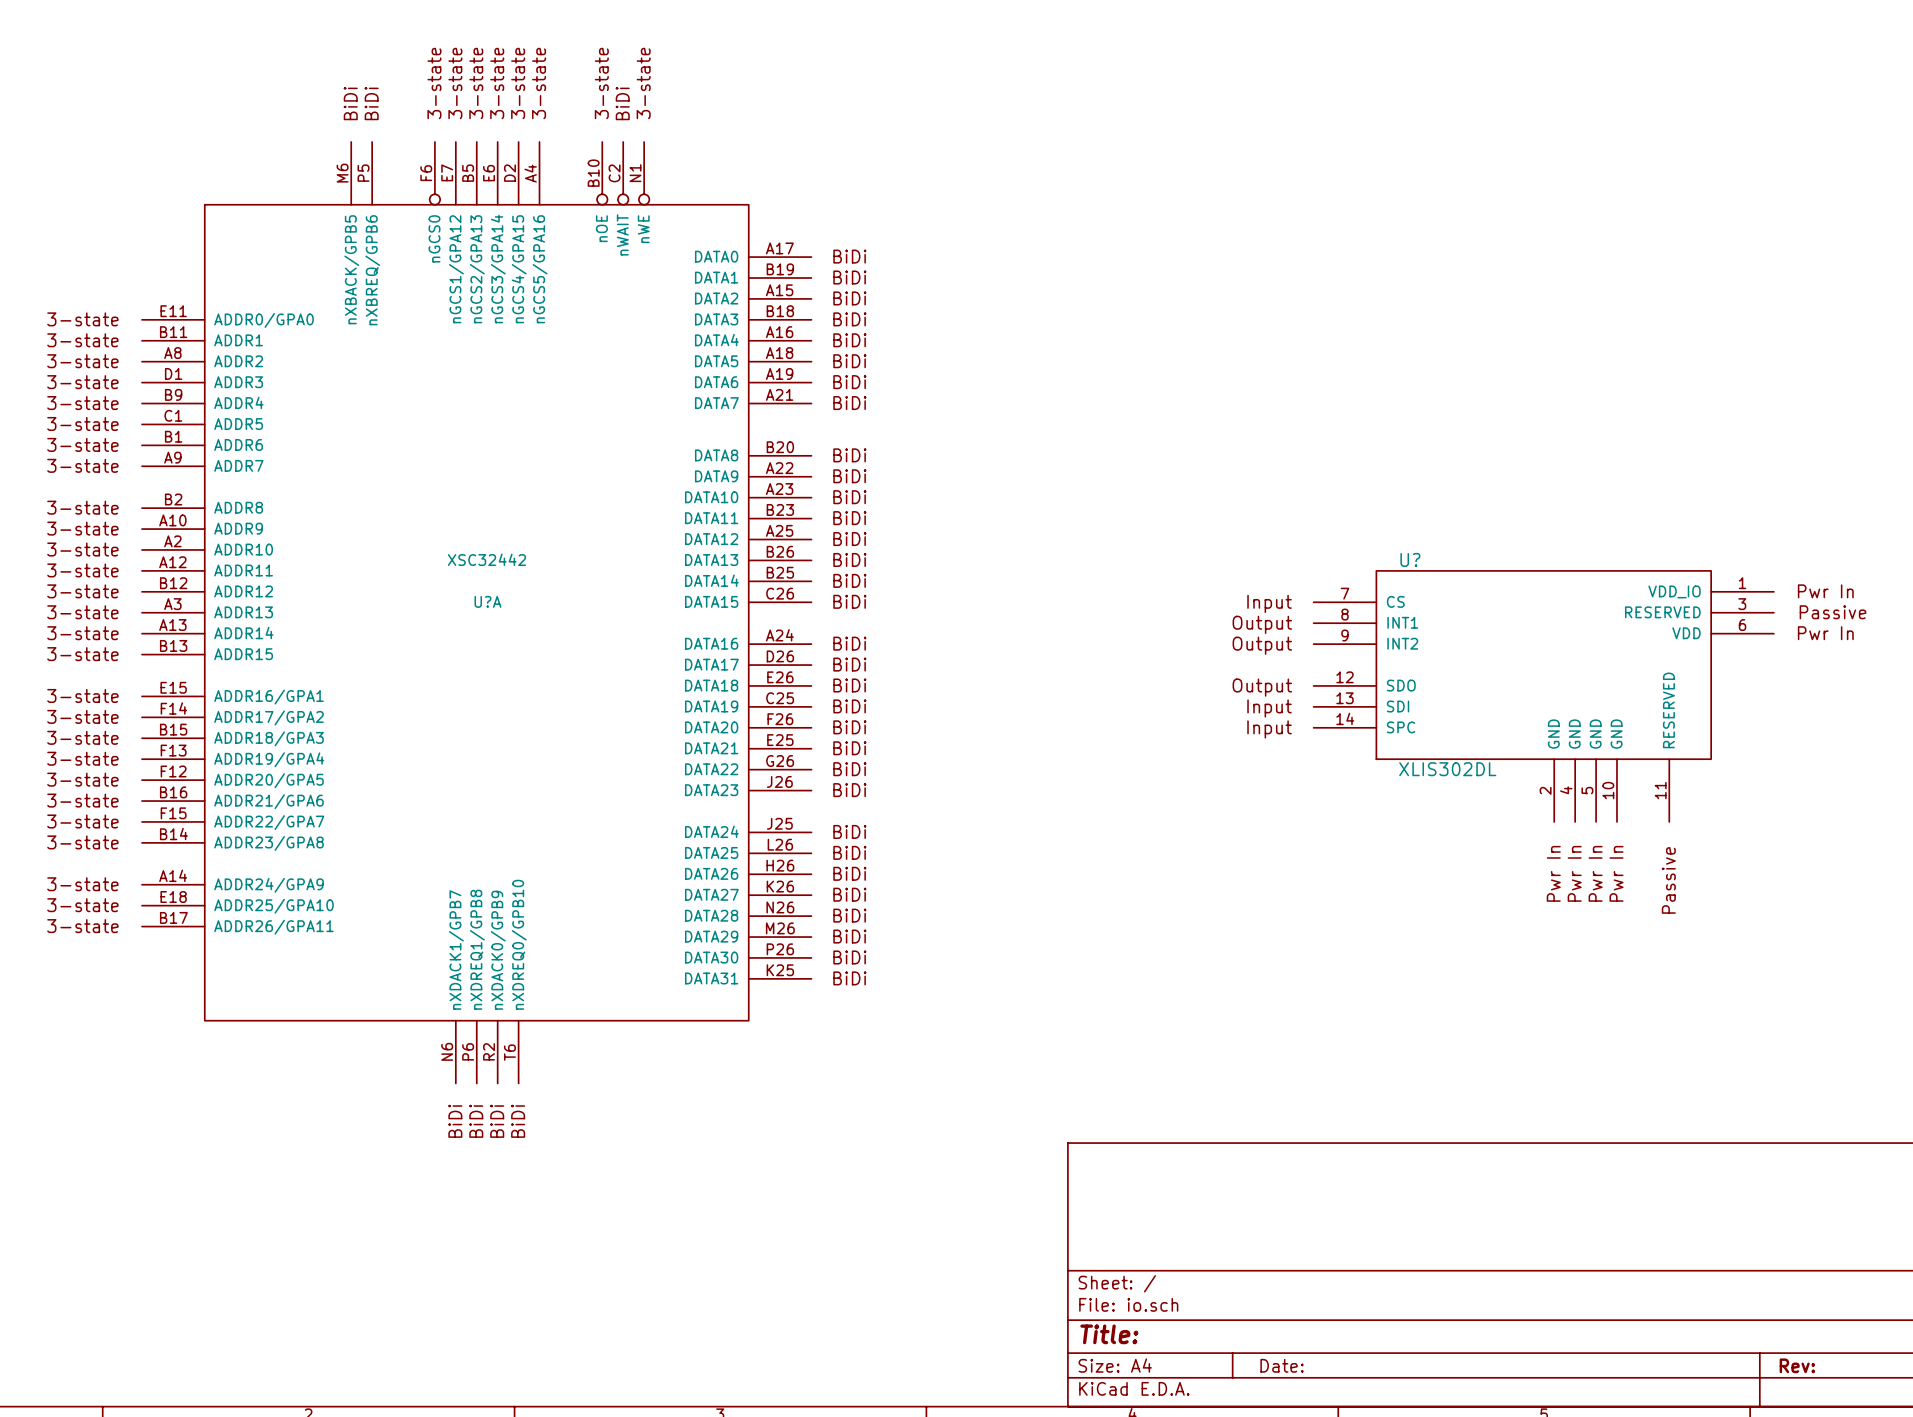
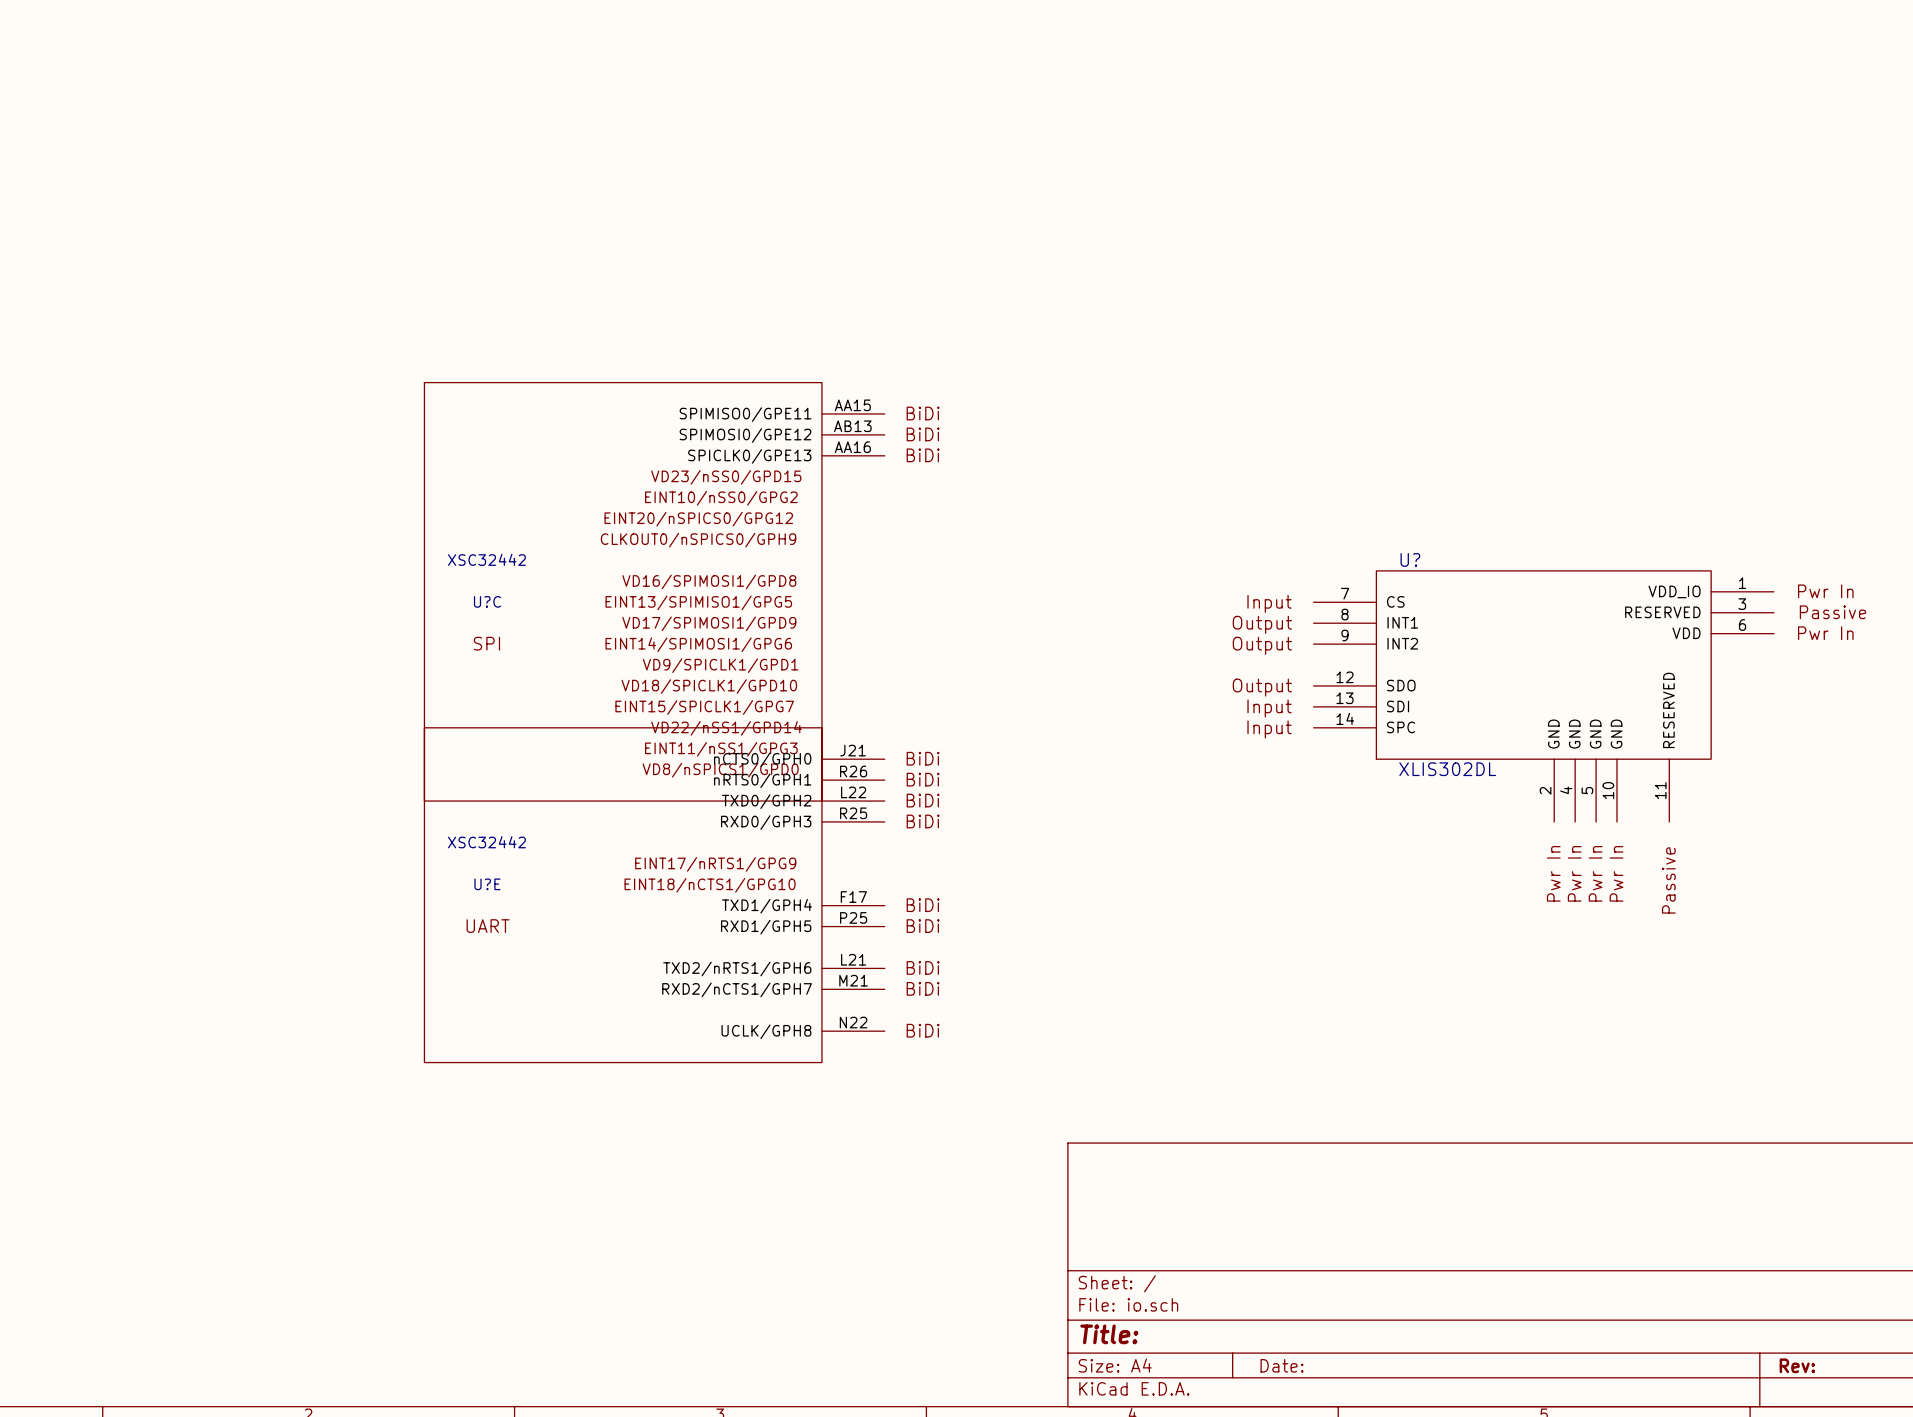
U?C: none -> XSC32442 (654, 591)
U?A: XSC32442 (476, 612) -> none
U?E: none -> XSC32442 (654, 895)

